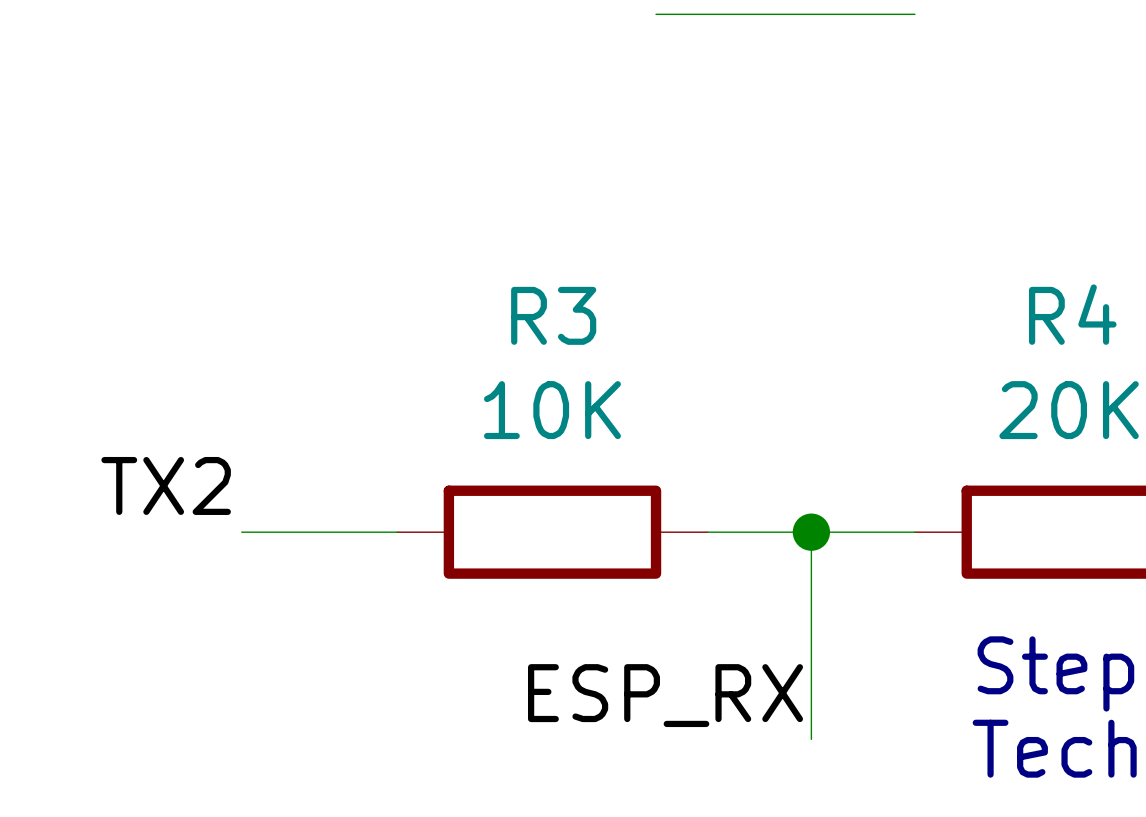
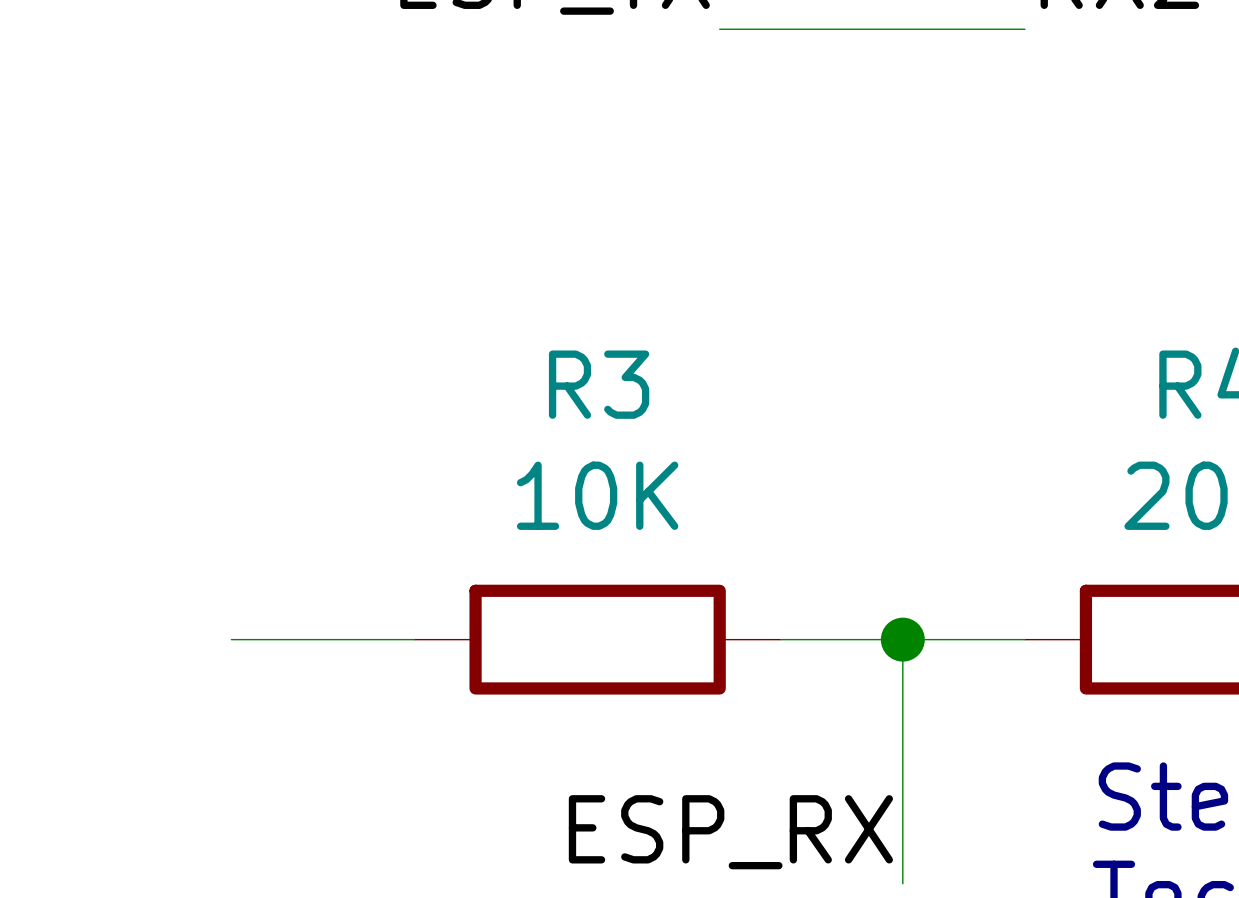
label: TX2 (166, 485) -> none

